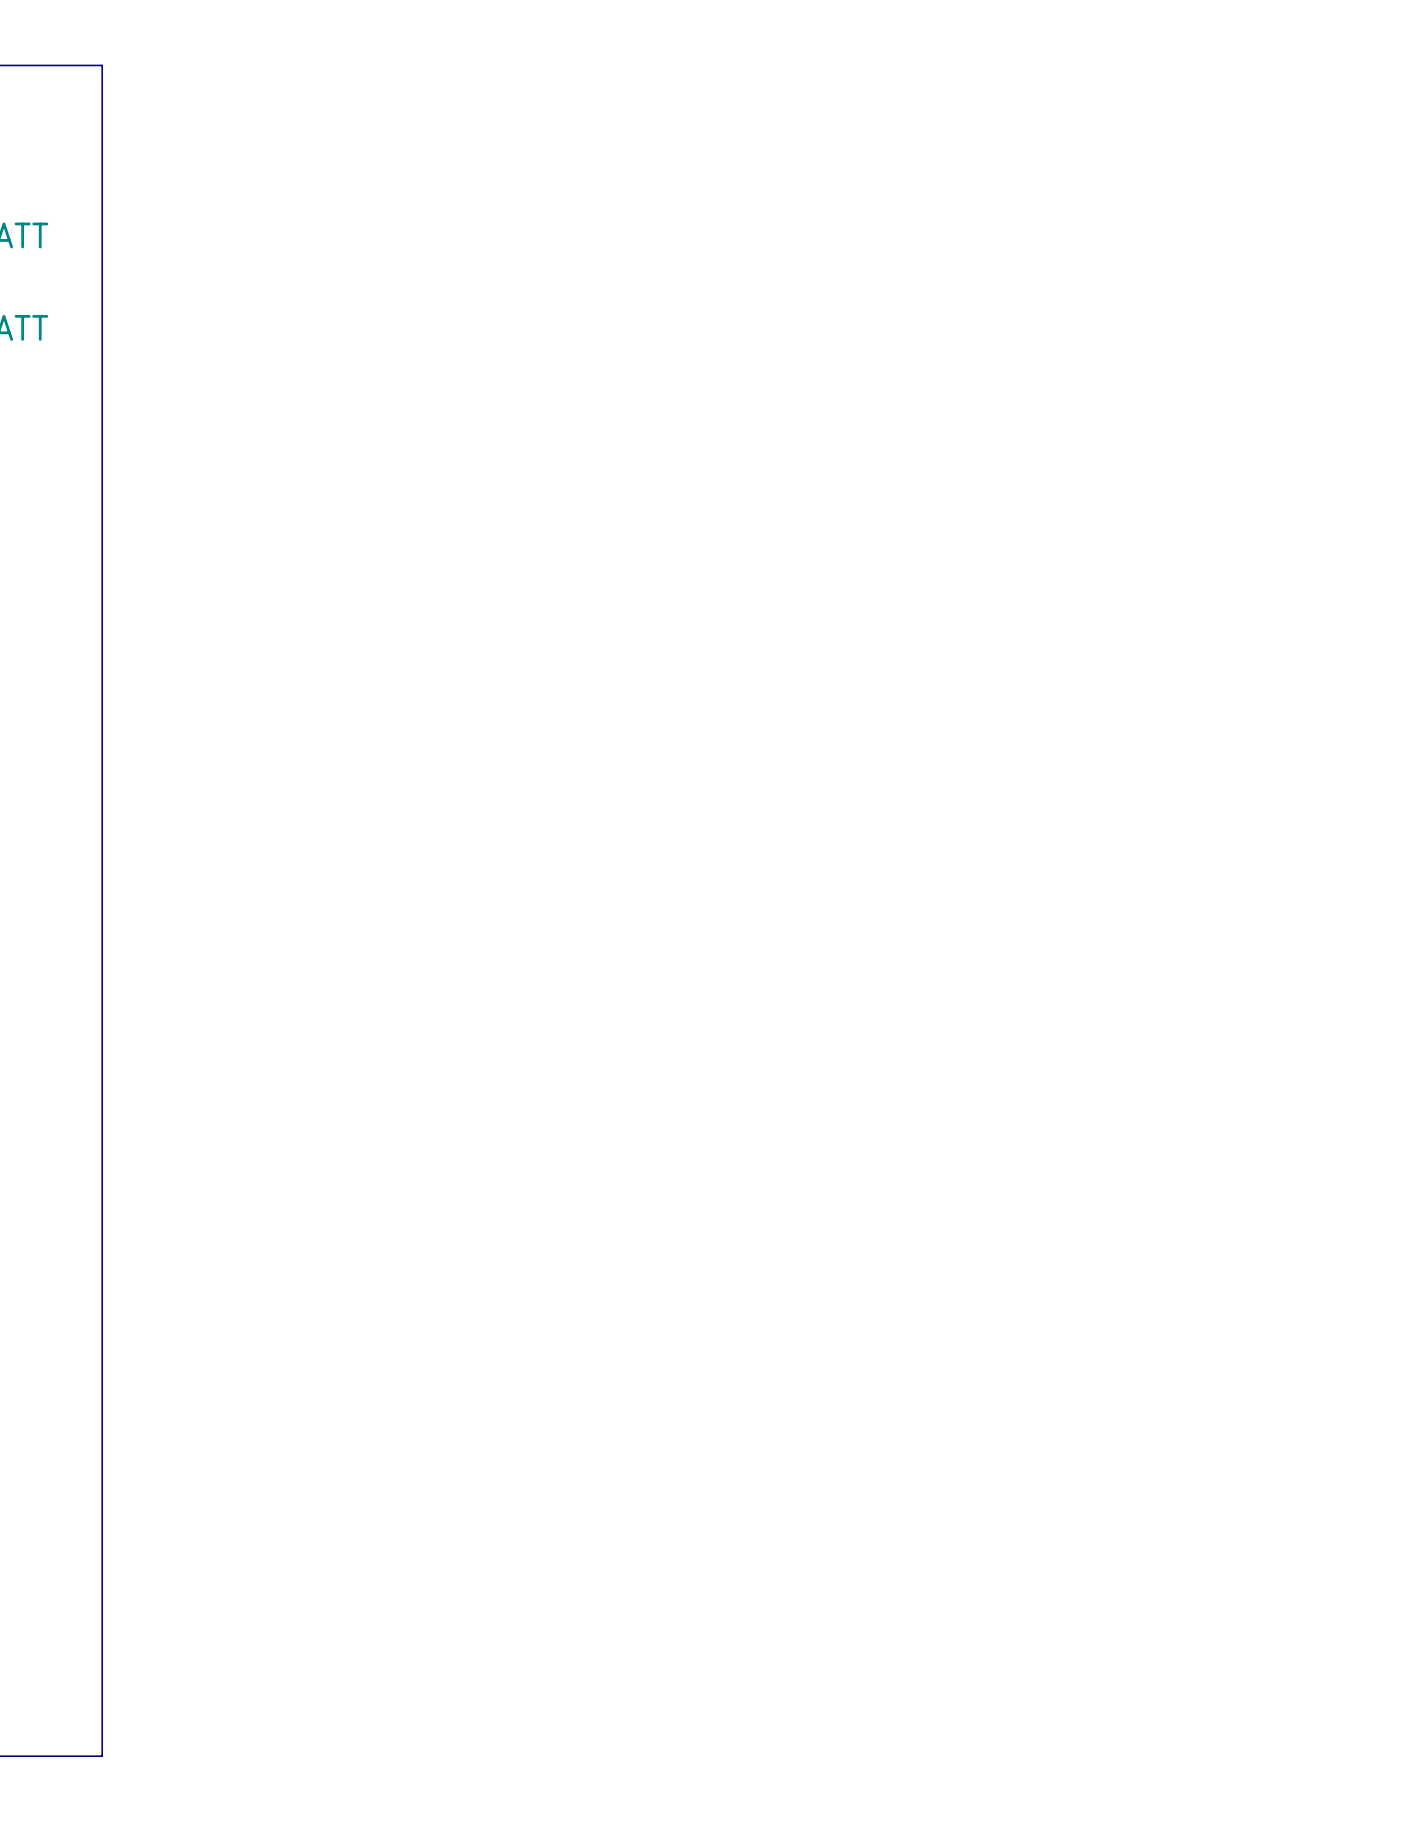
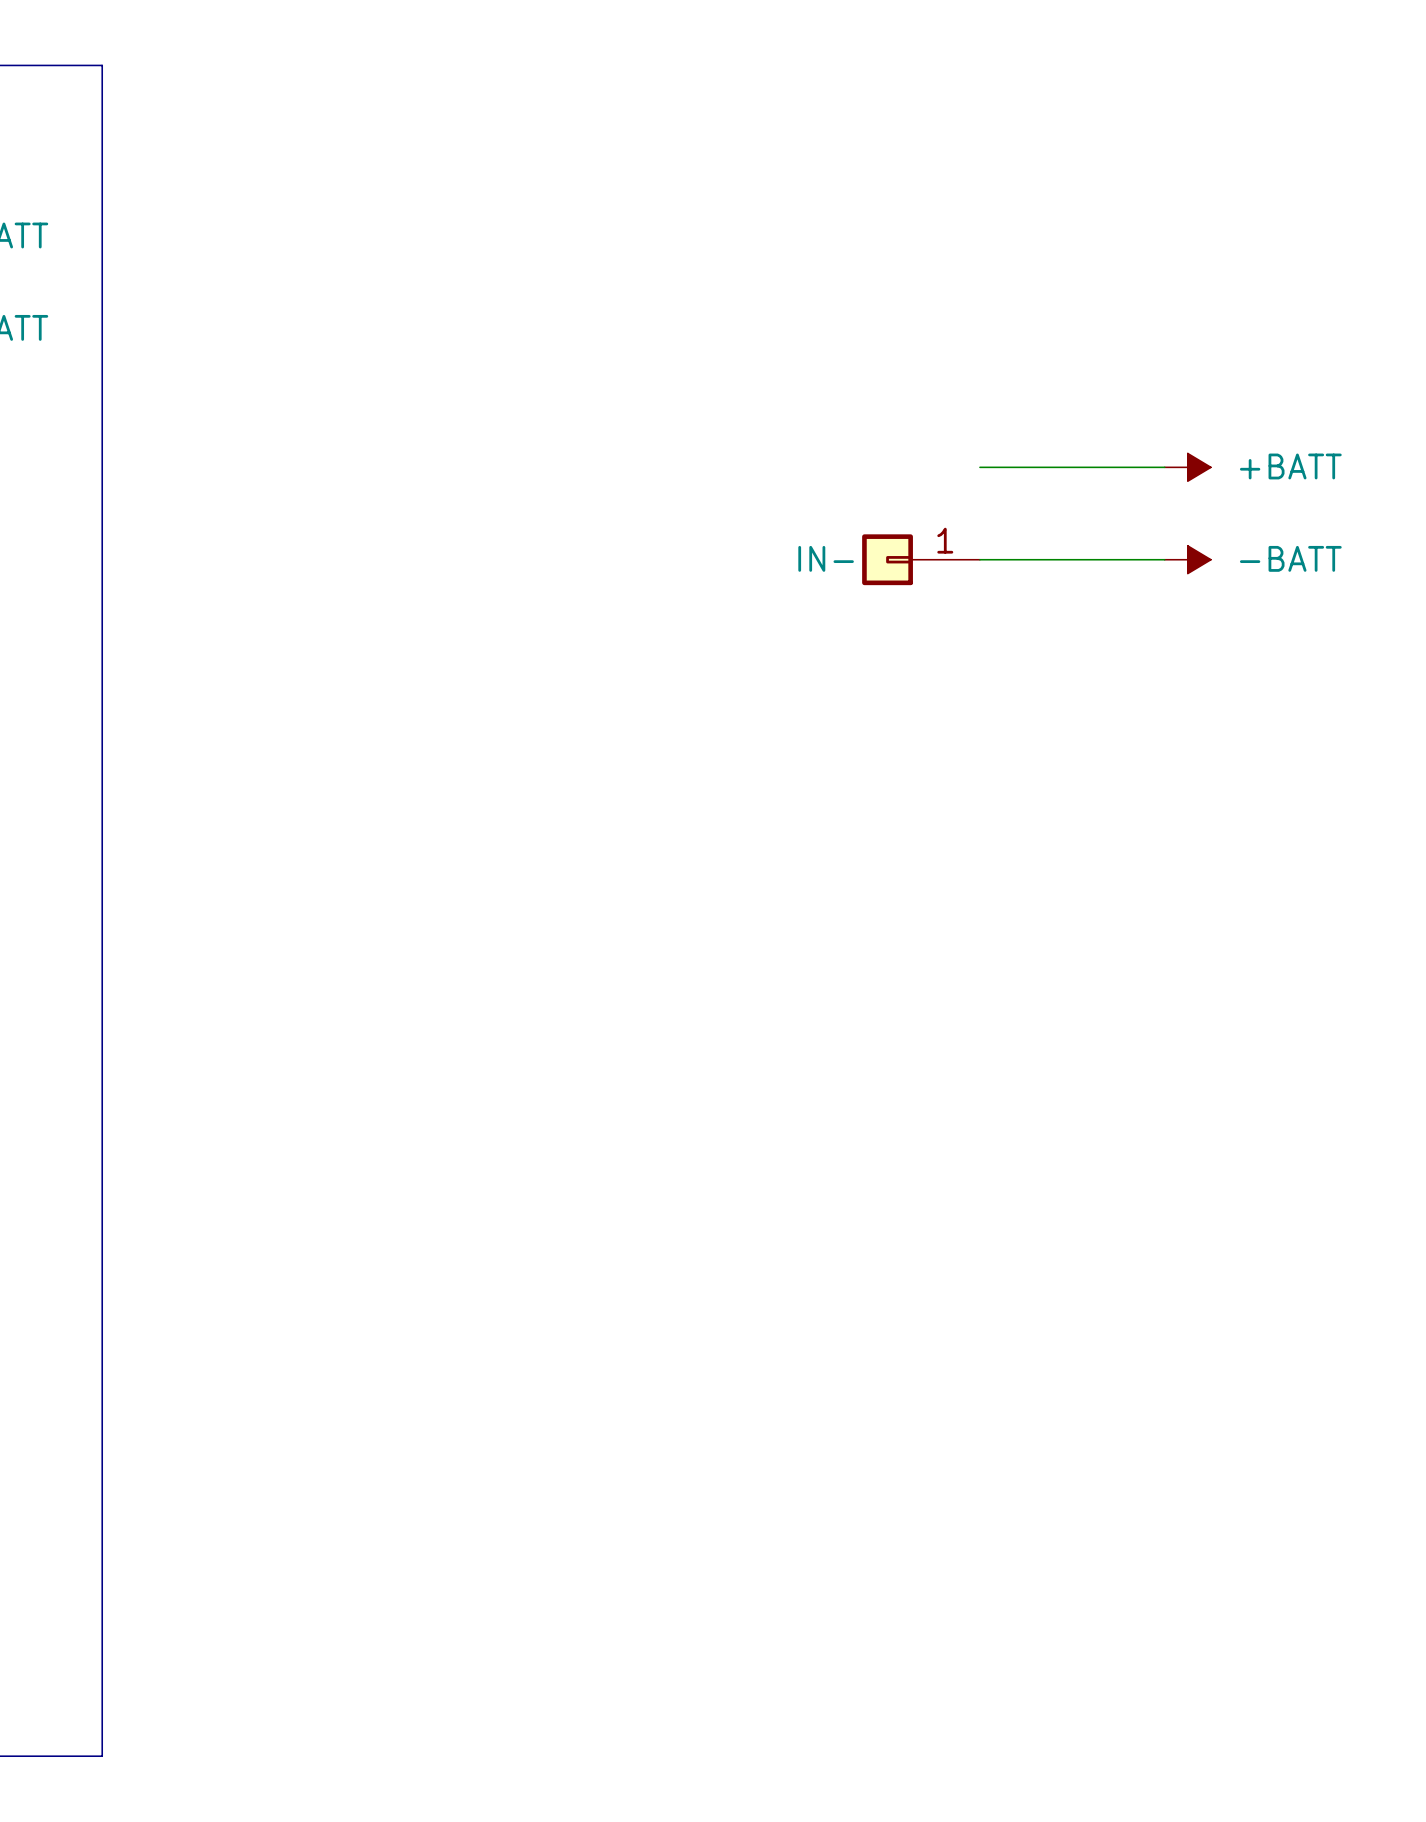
wire: none -> (979, 467) (1164, 467)
power symbol: none -> +BATT (1187, 467)
part: none -> IN- (921, 559)
wire: none -> (979, 559) (1164, 559)
power symbol: none -> -BATT (1187, 559)

